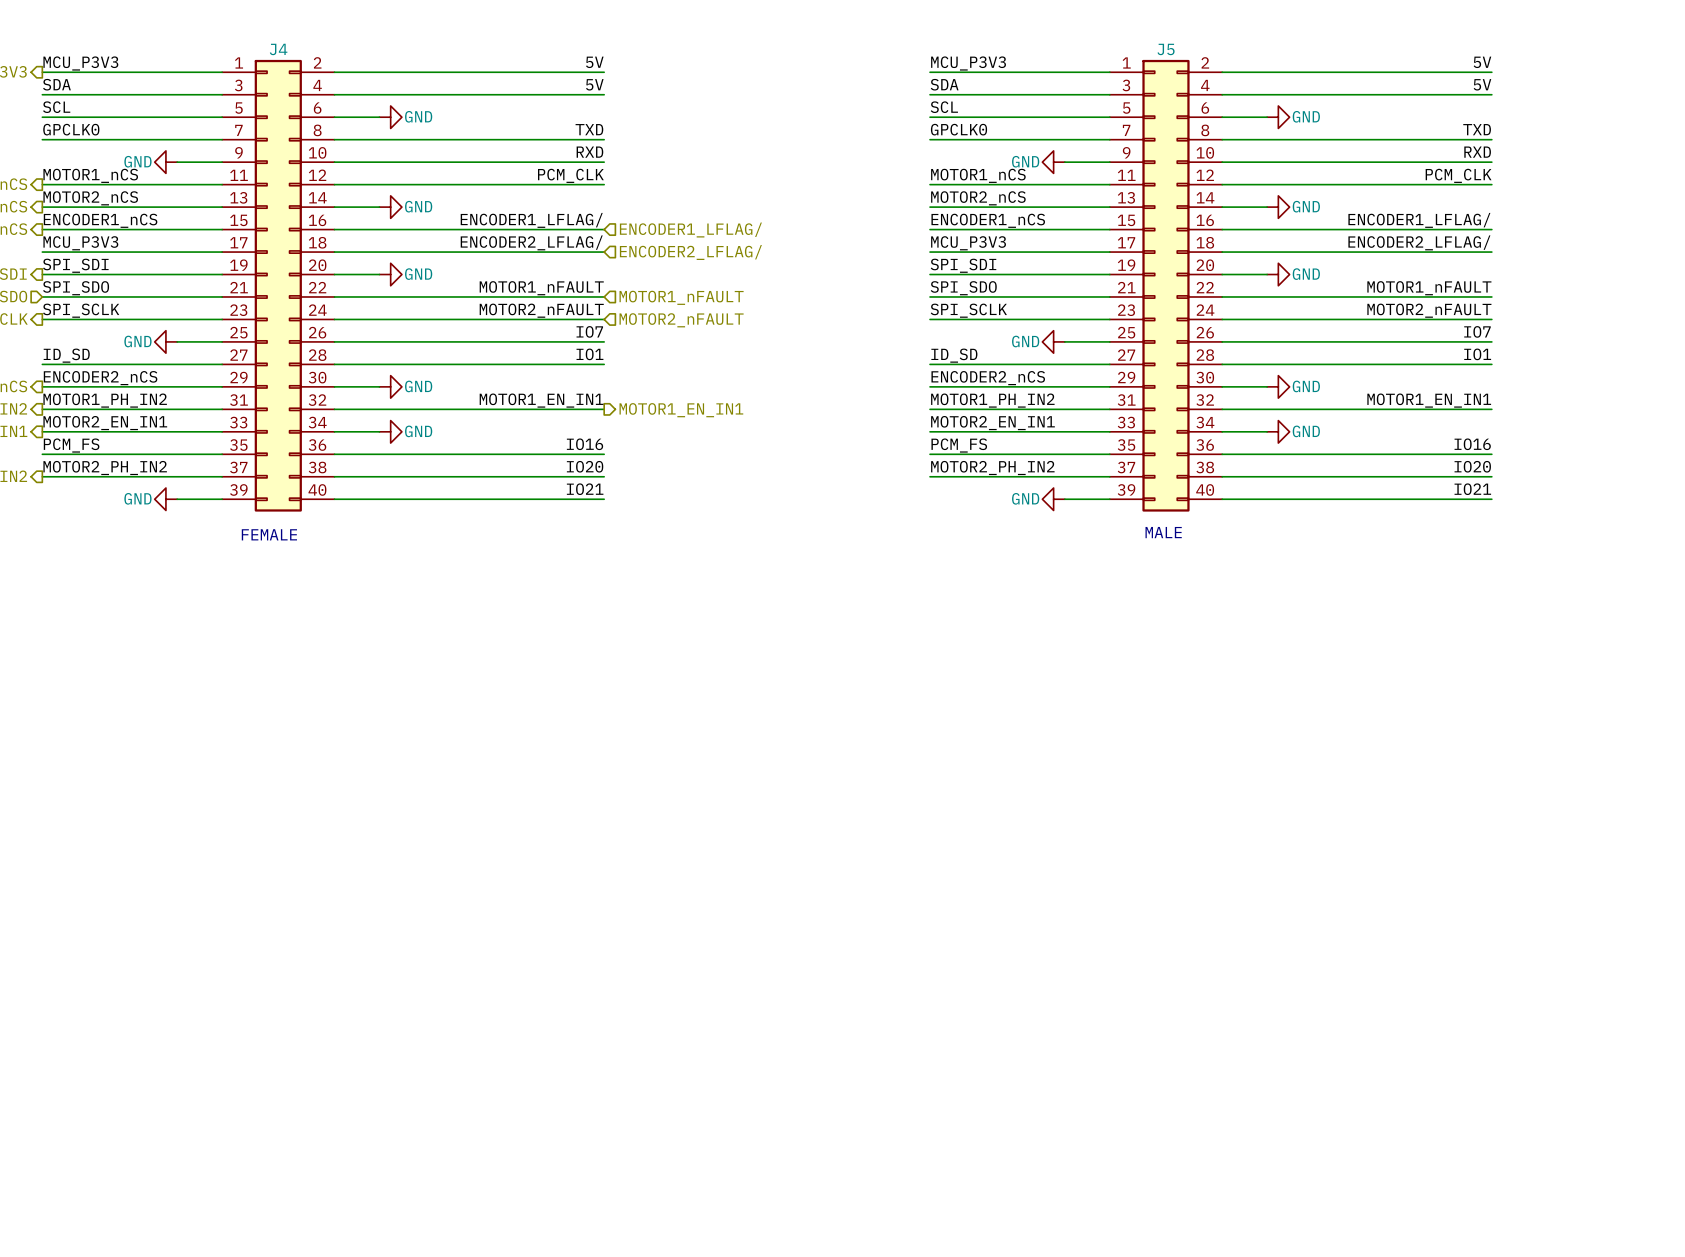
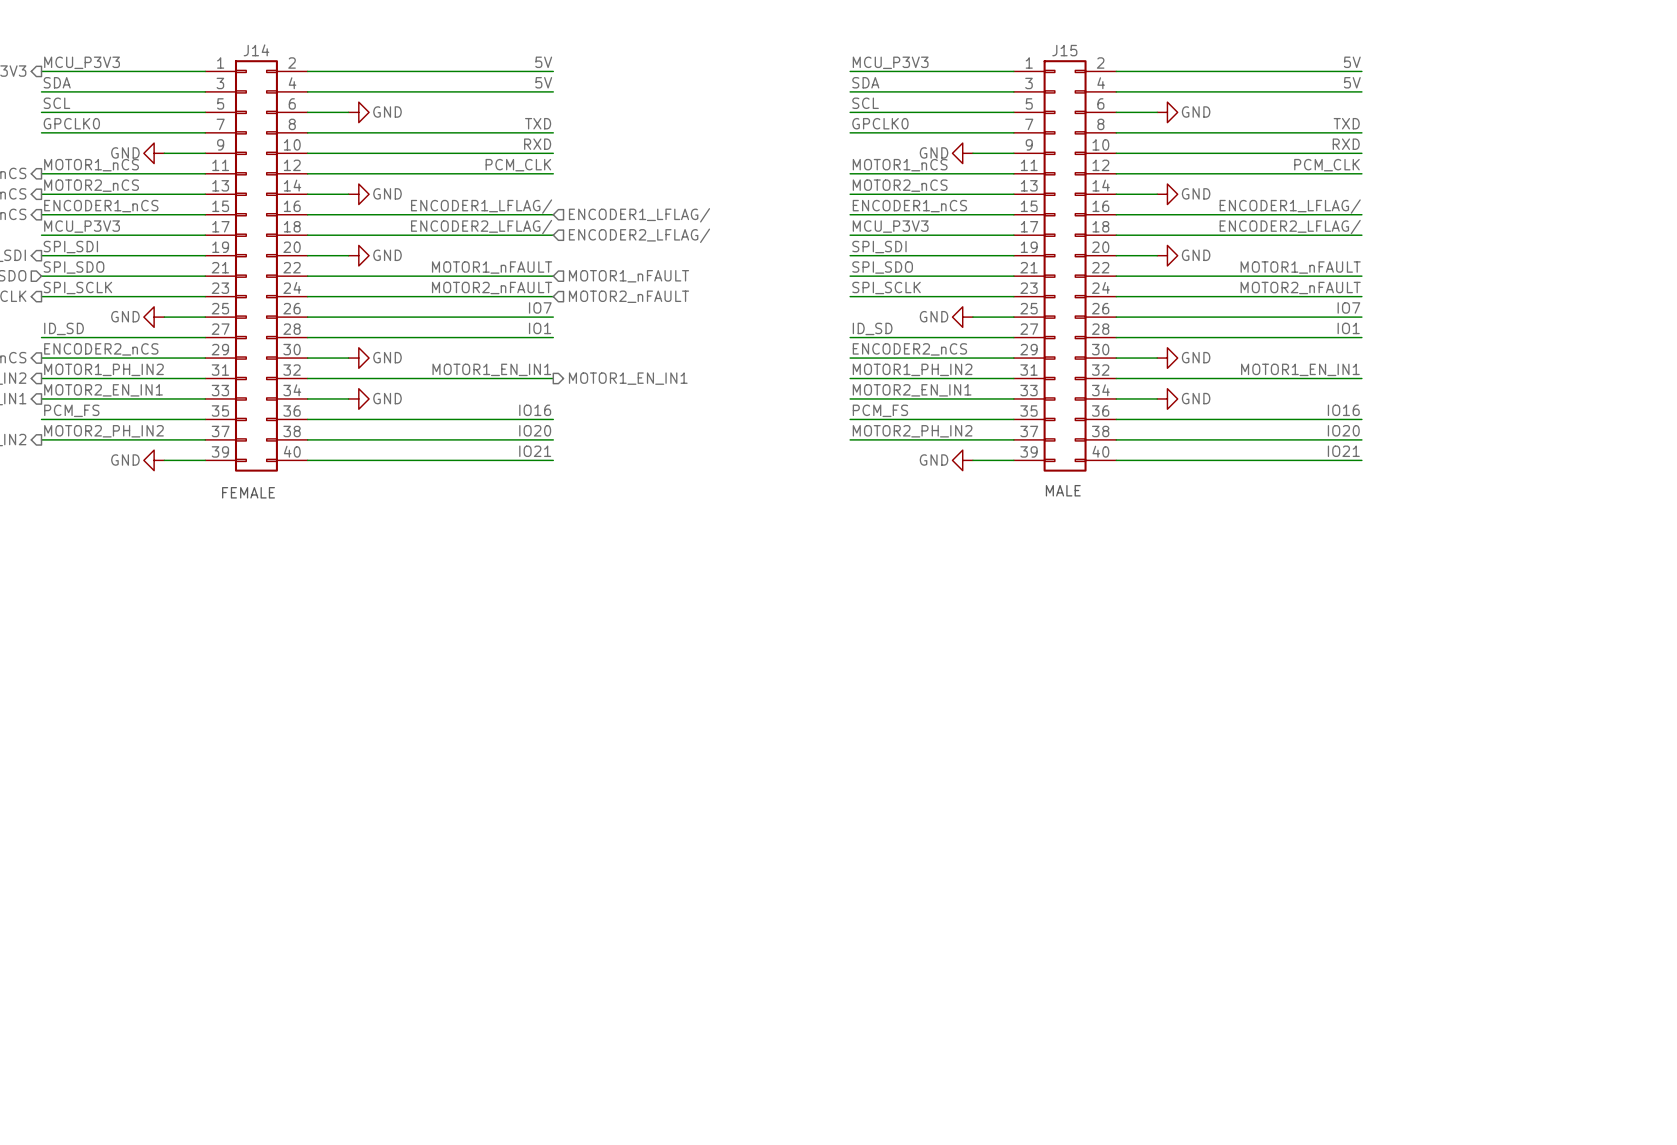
J4 name: J4 (278, 49) -> J14 (256, 50)
J5 name: J5 (1166, 49) -> J15 (1064, 50)

